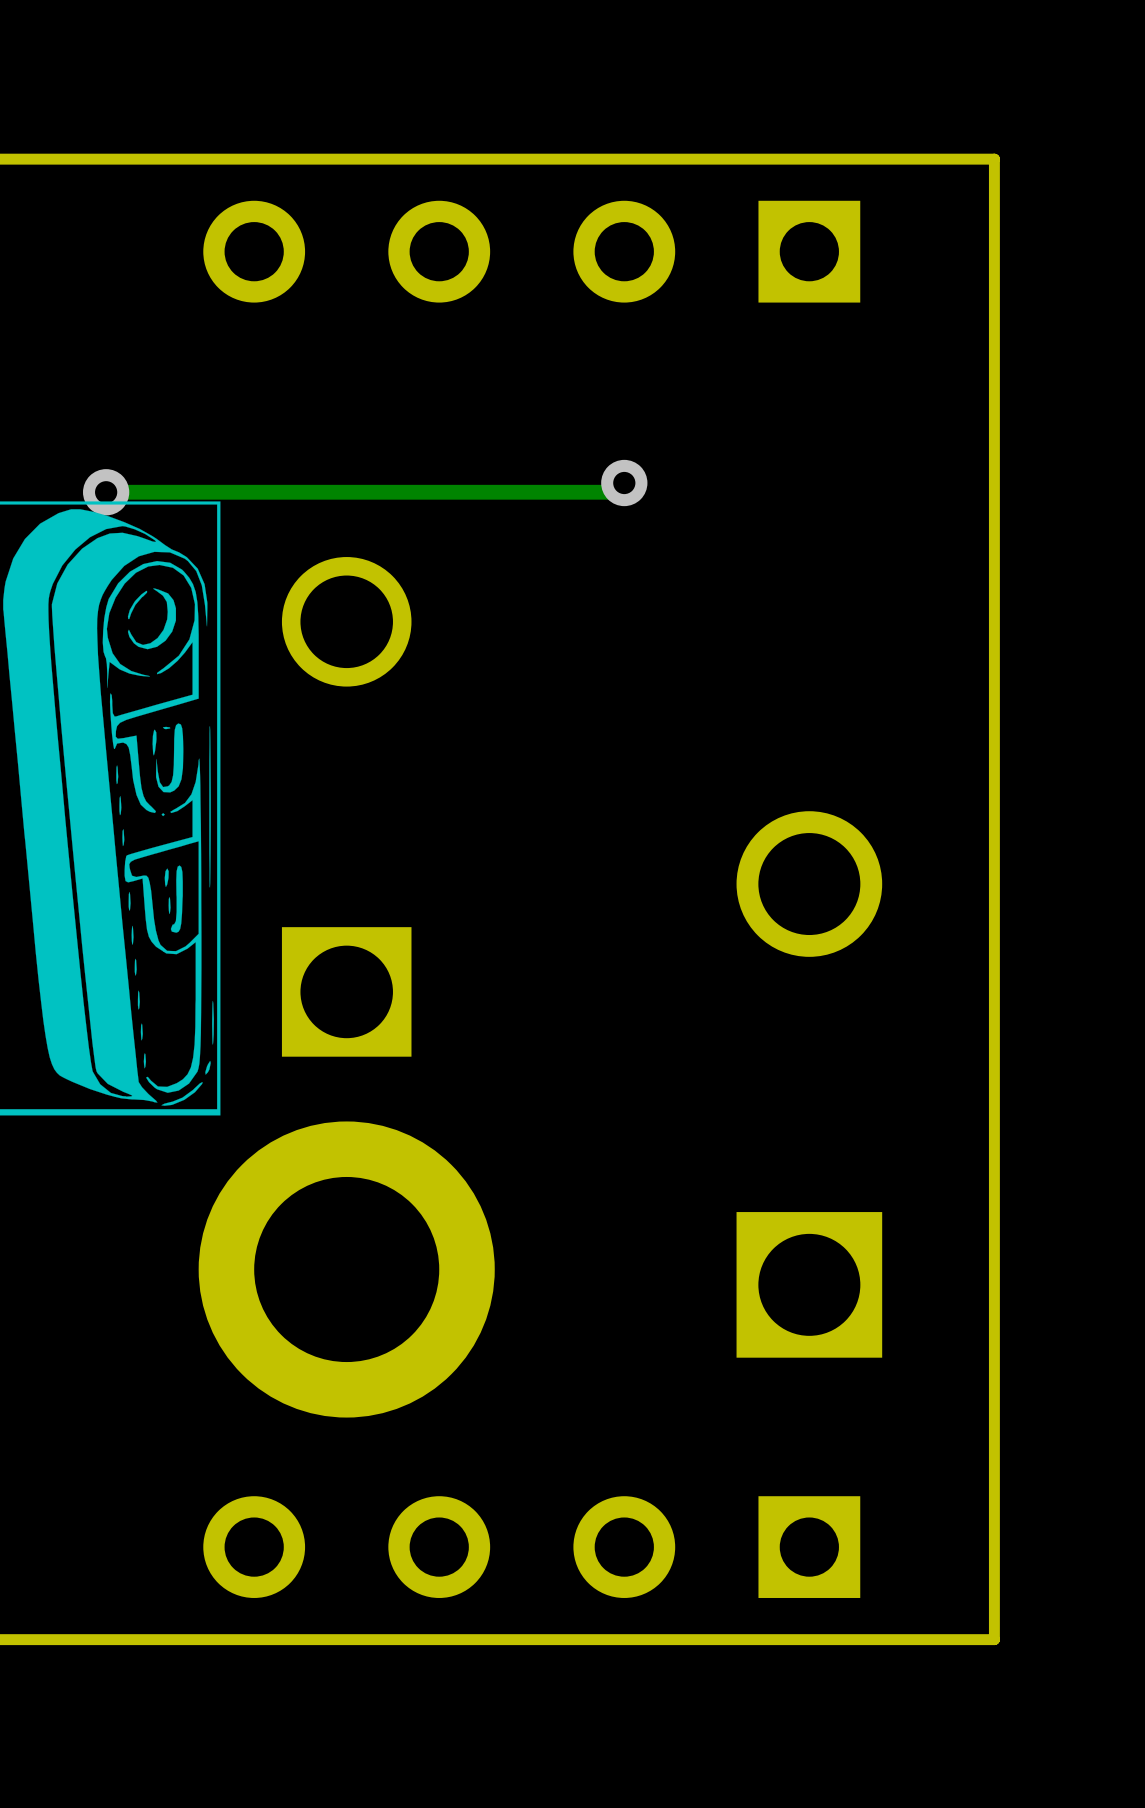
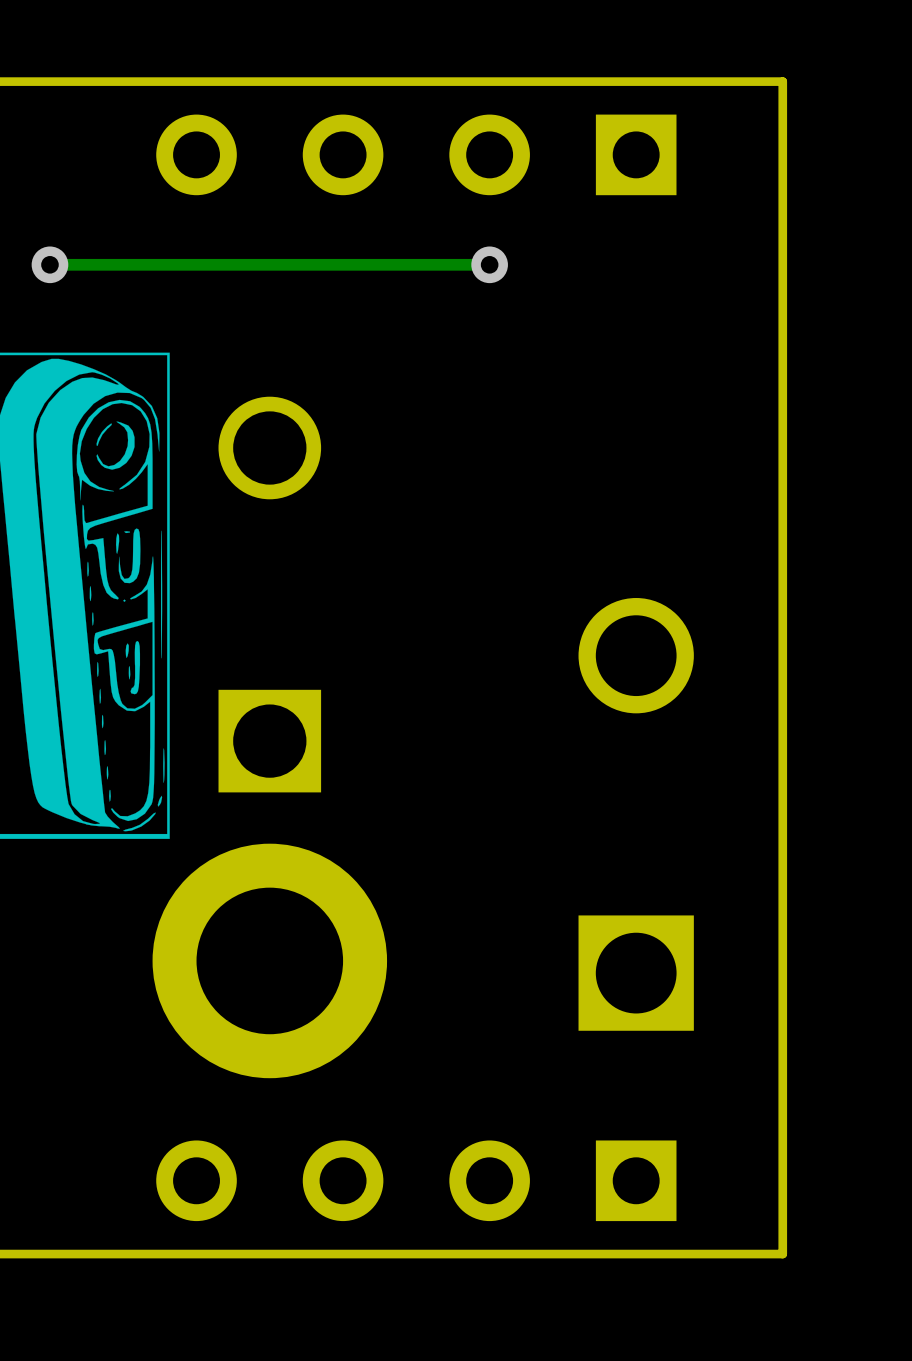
via: none -> (49, 264)
track: none -> (489, 264) (49, 264)
track: (624, 483) (615, 492) (106, 492) -> none
via position: (624, 483) -> (489, 264)
via: (106, 492) -> none

